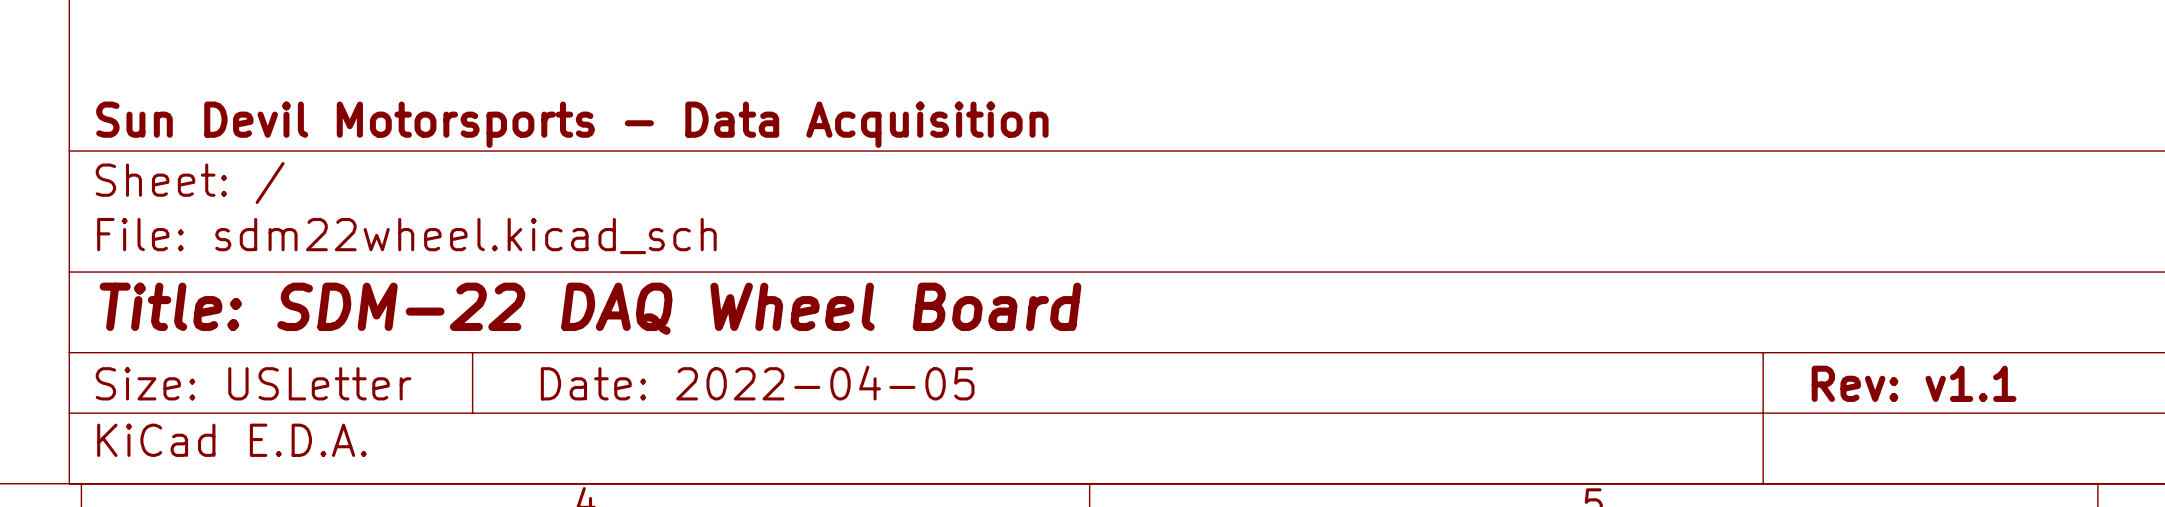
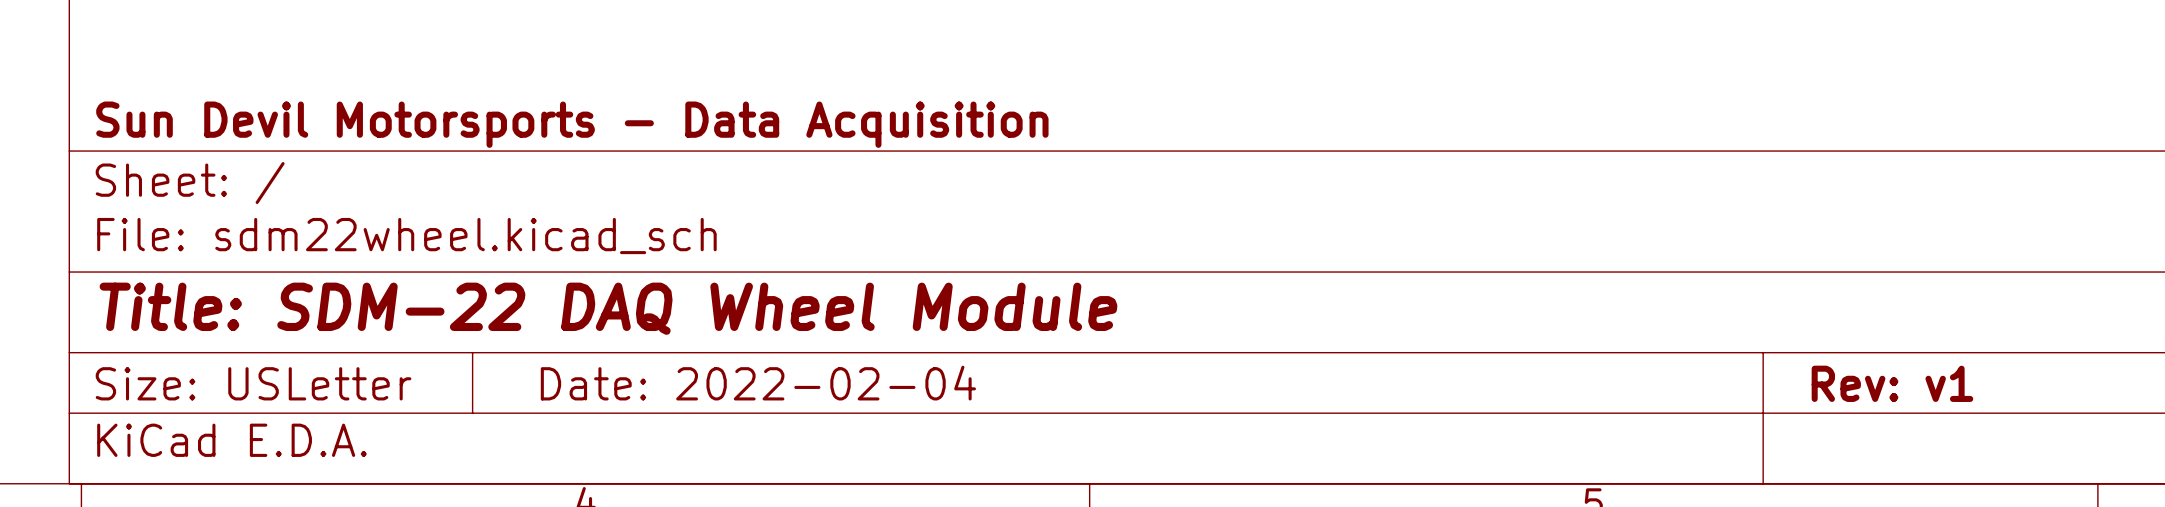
title block: Title: SDM-22 DAQ Wheel Board (590, 308) -> Title: SDM-22 DAQ Wheel Module (608, 308)
title block: Date: 2022-04-05 (757, 383) -> Date: 2022-02-04 (758, 383)
title block: Rev: v1.1 (1914, 383) -> Rev: v1 (1892, 383)

